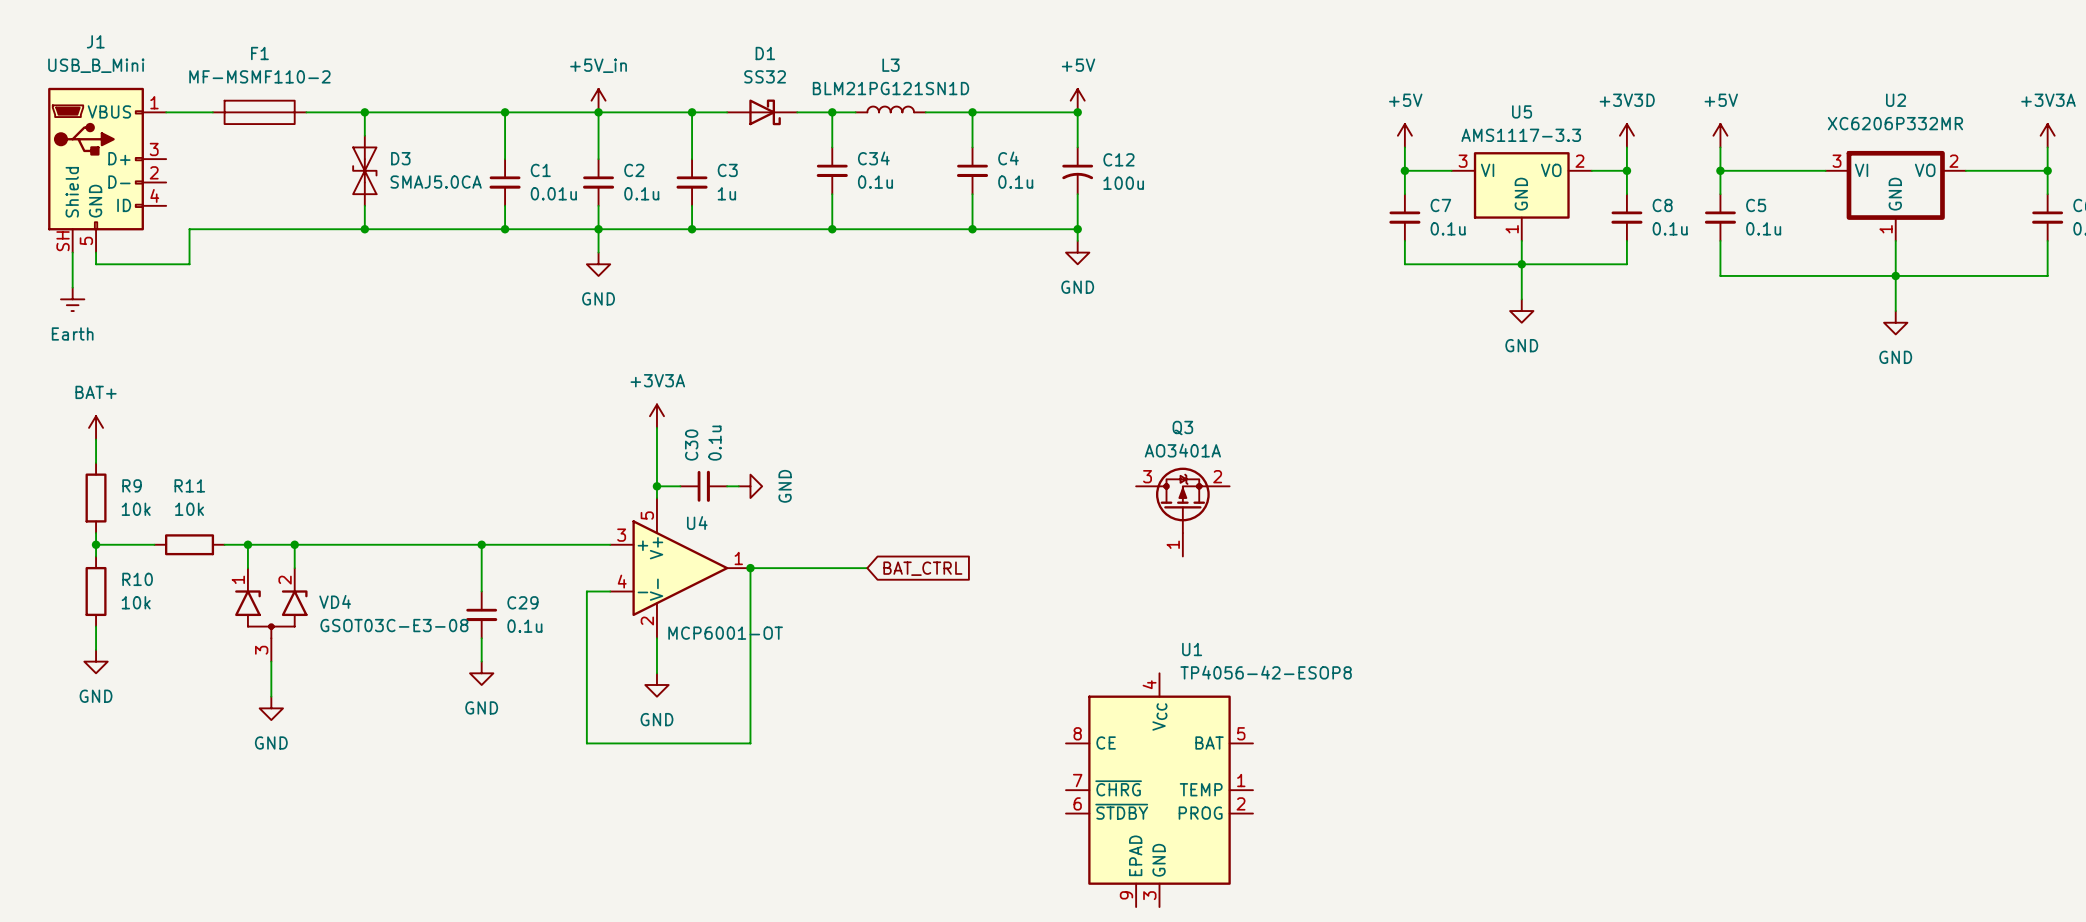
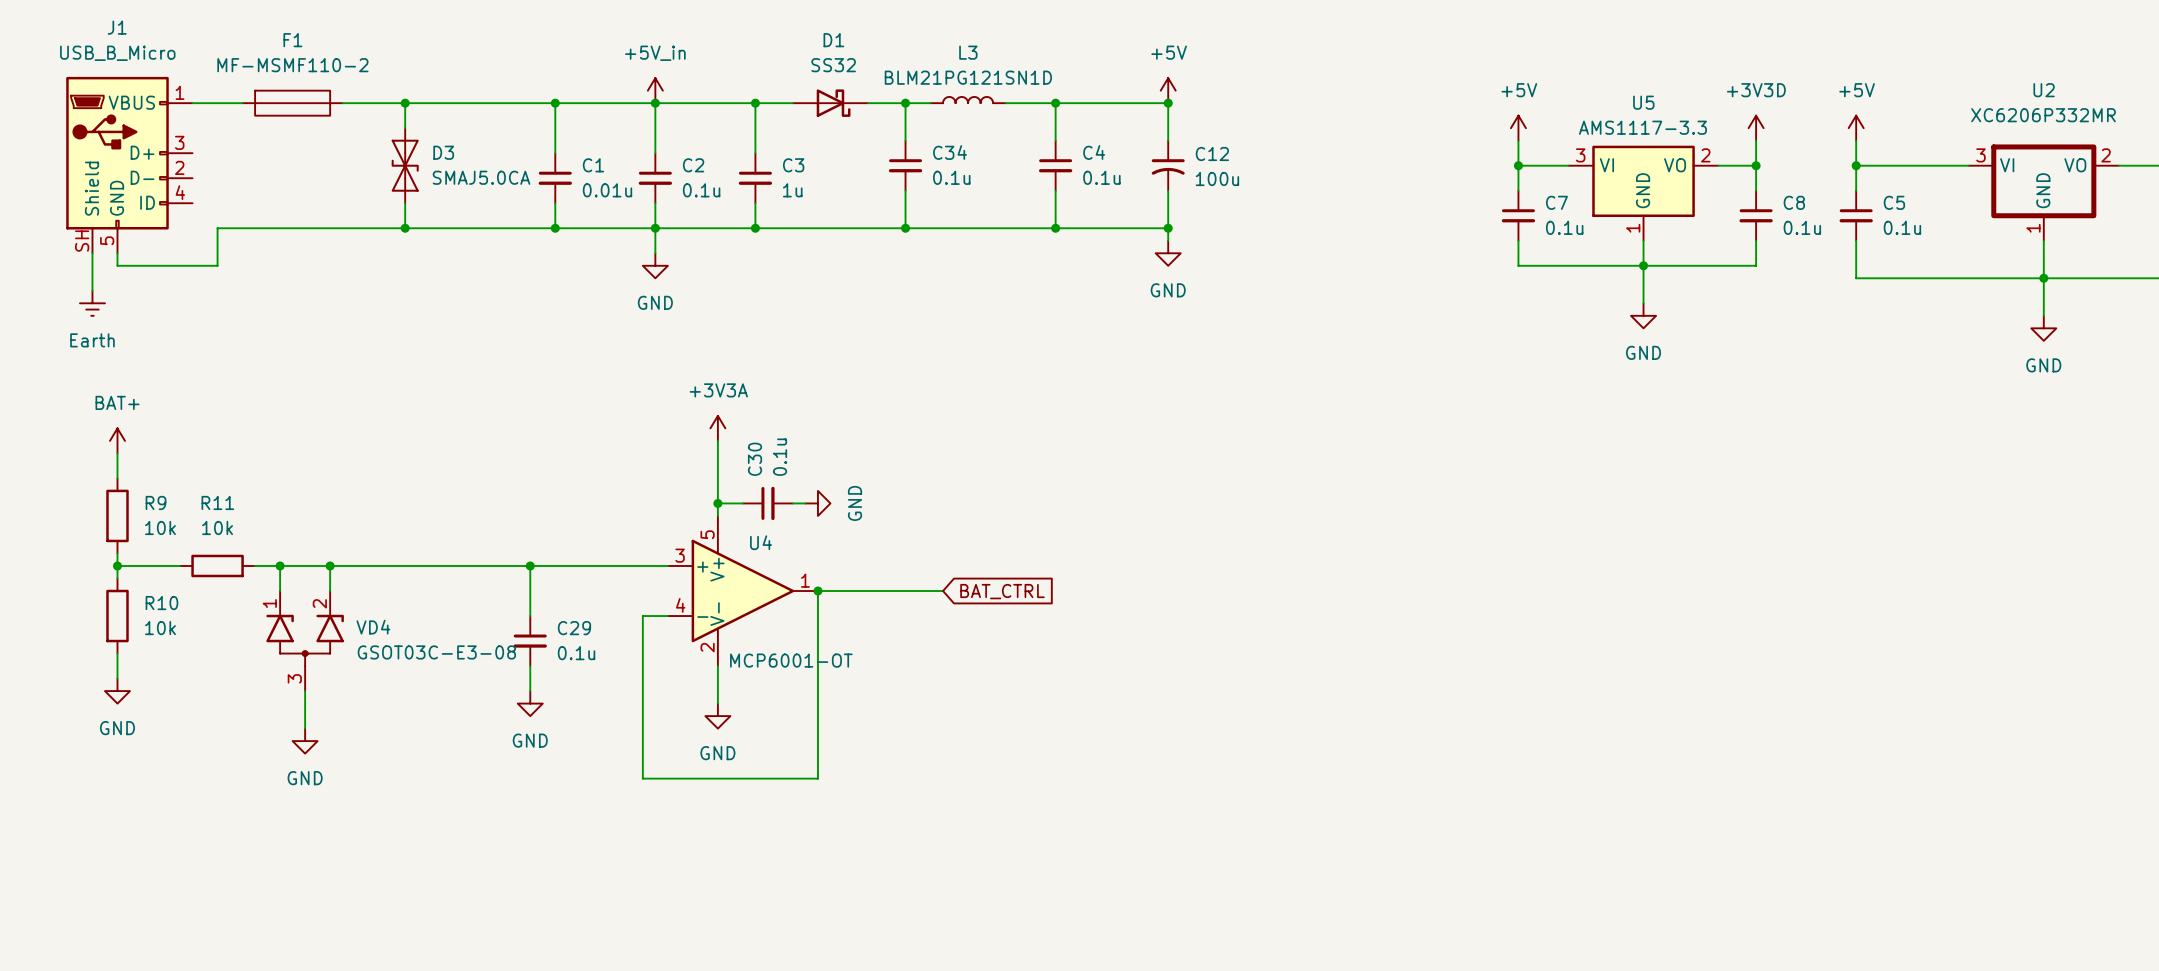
J1 value: USB_B_Mini (96, 65) -> USB_B_Micro (117, 53)
Q3: AO3401A (1182, 512) -> none
U1: TP4056-42-ESOP8 (1159, 790) -> none

